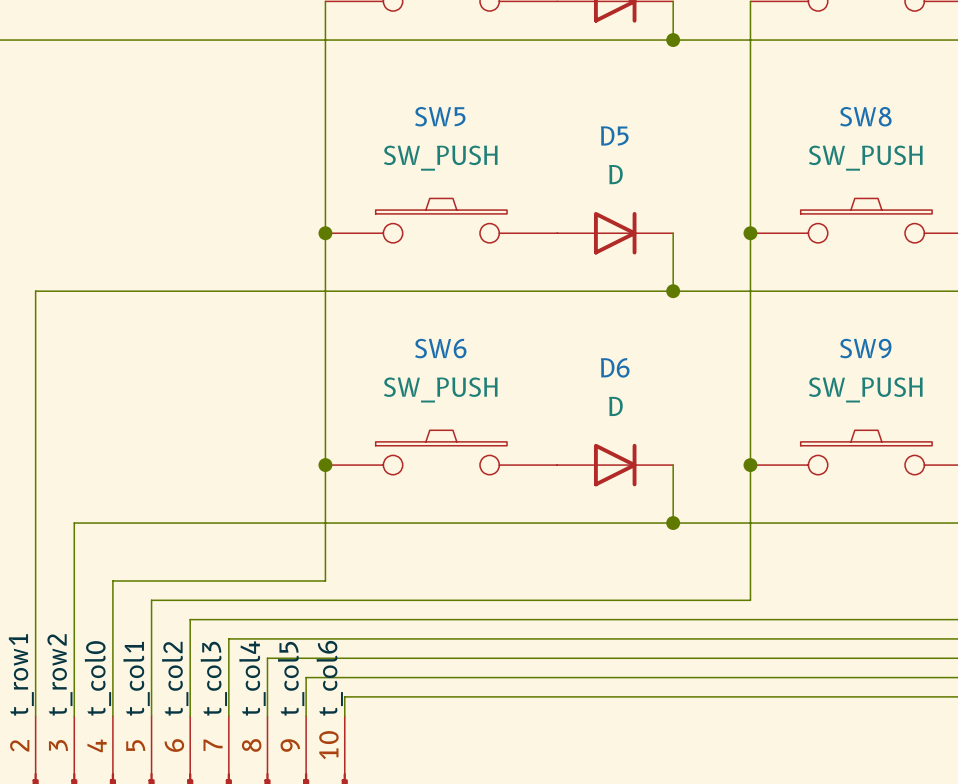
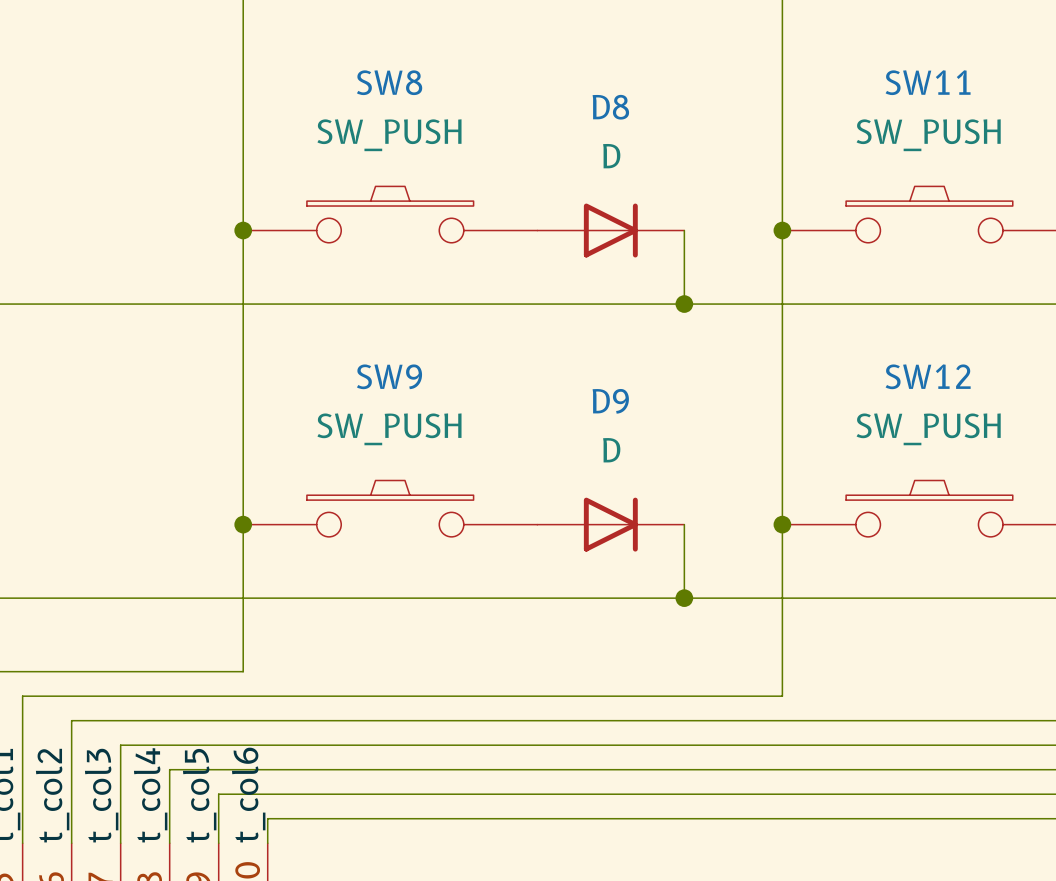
SW5 name: SW5 (440, 116) -> SW8 (389, 82)
SW8 name: SW8 (865, 116) -> SW11 (928, 82)
D5 name: D5 (614, 135) -> D8 (610, 107)
SW6 name: SW6 (440, 348) -> SW9 (389, 376)
SW9 name: SW9 (865, 348) -> SW12 (928, 376)
D6 name: D6 (615, 367) -> D9 (610, 401)

